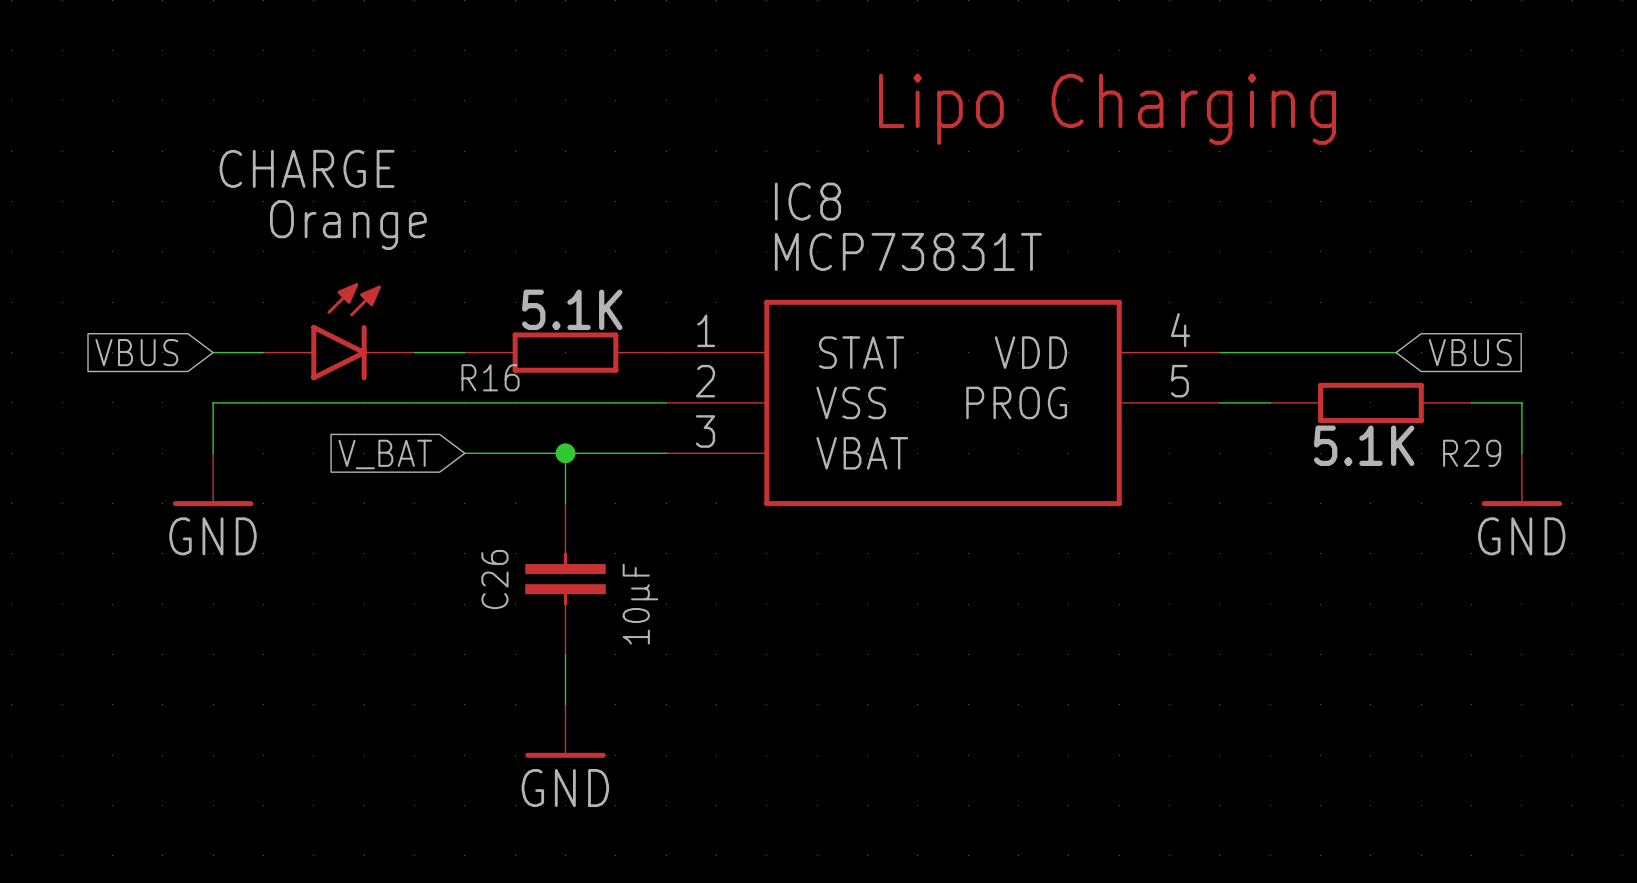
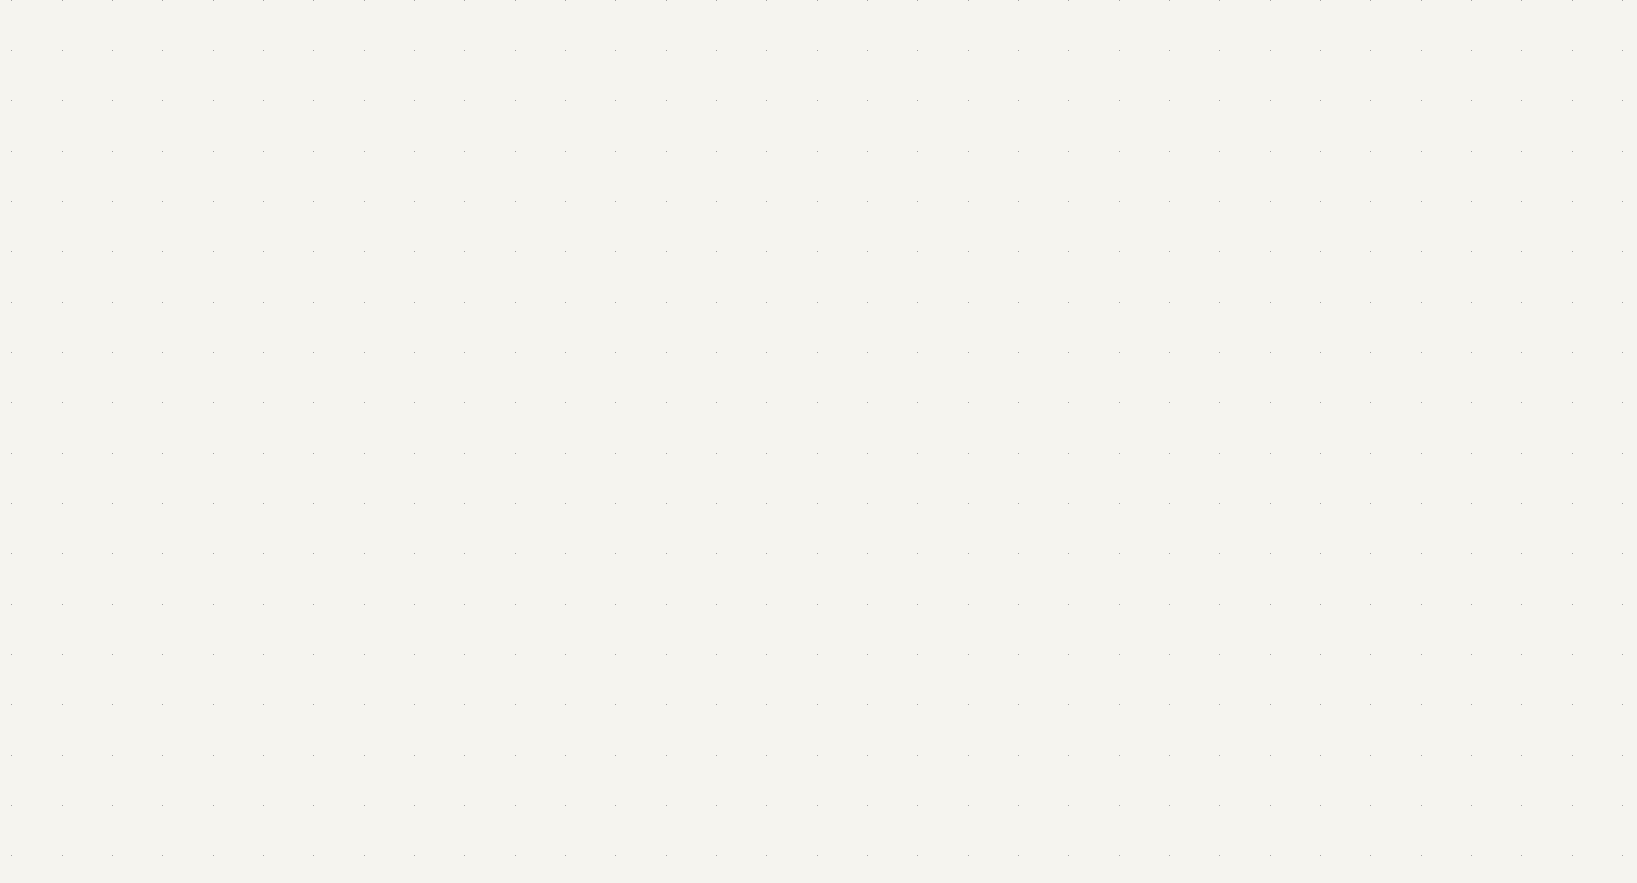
text: Lipo Charging (1107, 109) -> none
CHARGE: Orange (338, 331) -> none
global label: VBUS (136, 352) -> none
wire: (213, 352) (263, 352) -> none
wire: (414, 352) (464, 352) -> none
R16: 5.1K (565, 352) -> none
wire: (1219, 352) (1396, 352) -> none
global label: VBUS (1470, 352) -> none
wire: (666, 402) (213, 402) (213, 453) -> none
IC8: MCP73831T (943, 402) -> none
wire: (1219, 402) (1270, 402) -> none
R29: 5.1K (1370, 402) -> none
wire: (1471, 402) (1521, 402) (1521, 453) -> none
wire: (464, 453) (666, 453) -> none
wire: (565, 453) (565, 503) -> none
junction: (565, 453) -> none
global label: V_BAT (385, 454) -> none
power symbol: GND (213, 479) -> none
power symbol: GND (1521, 479) -> none
C26: 10µF (565, 579) -> none
wire: (565, 654) (565, 704) -> none
power symbol: GND (565, 731) -> none

